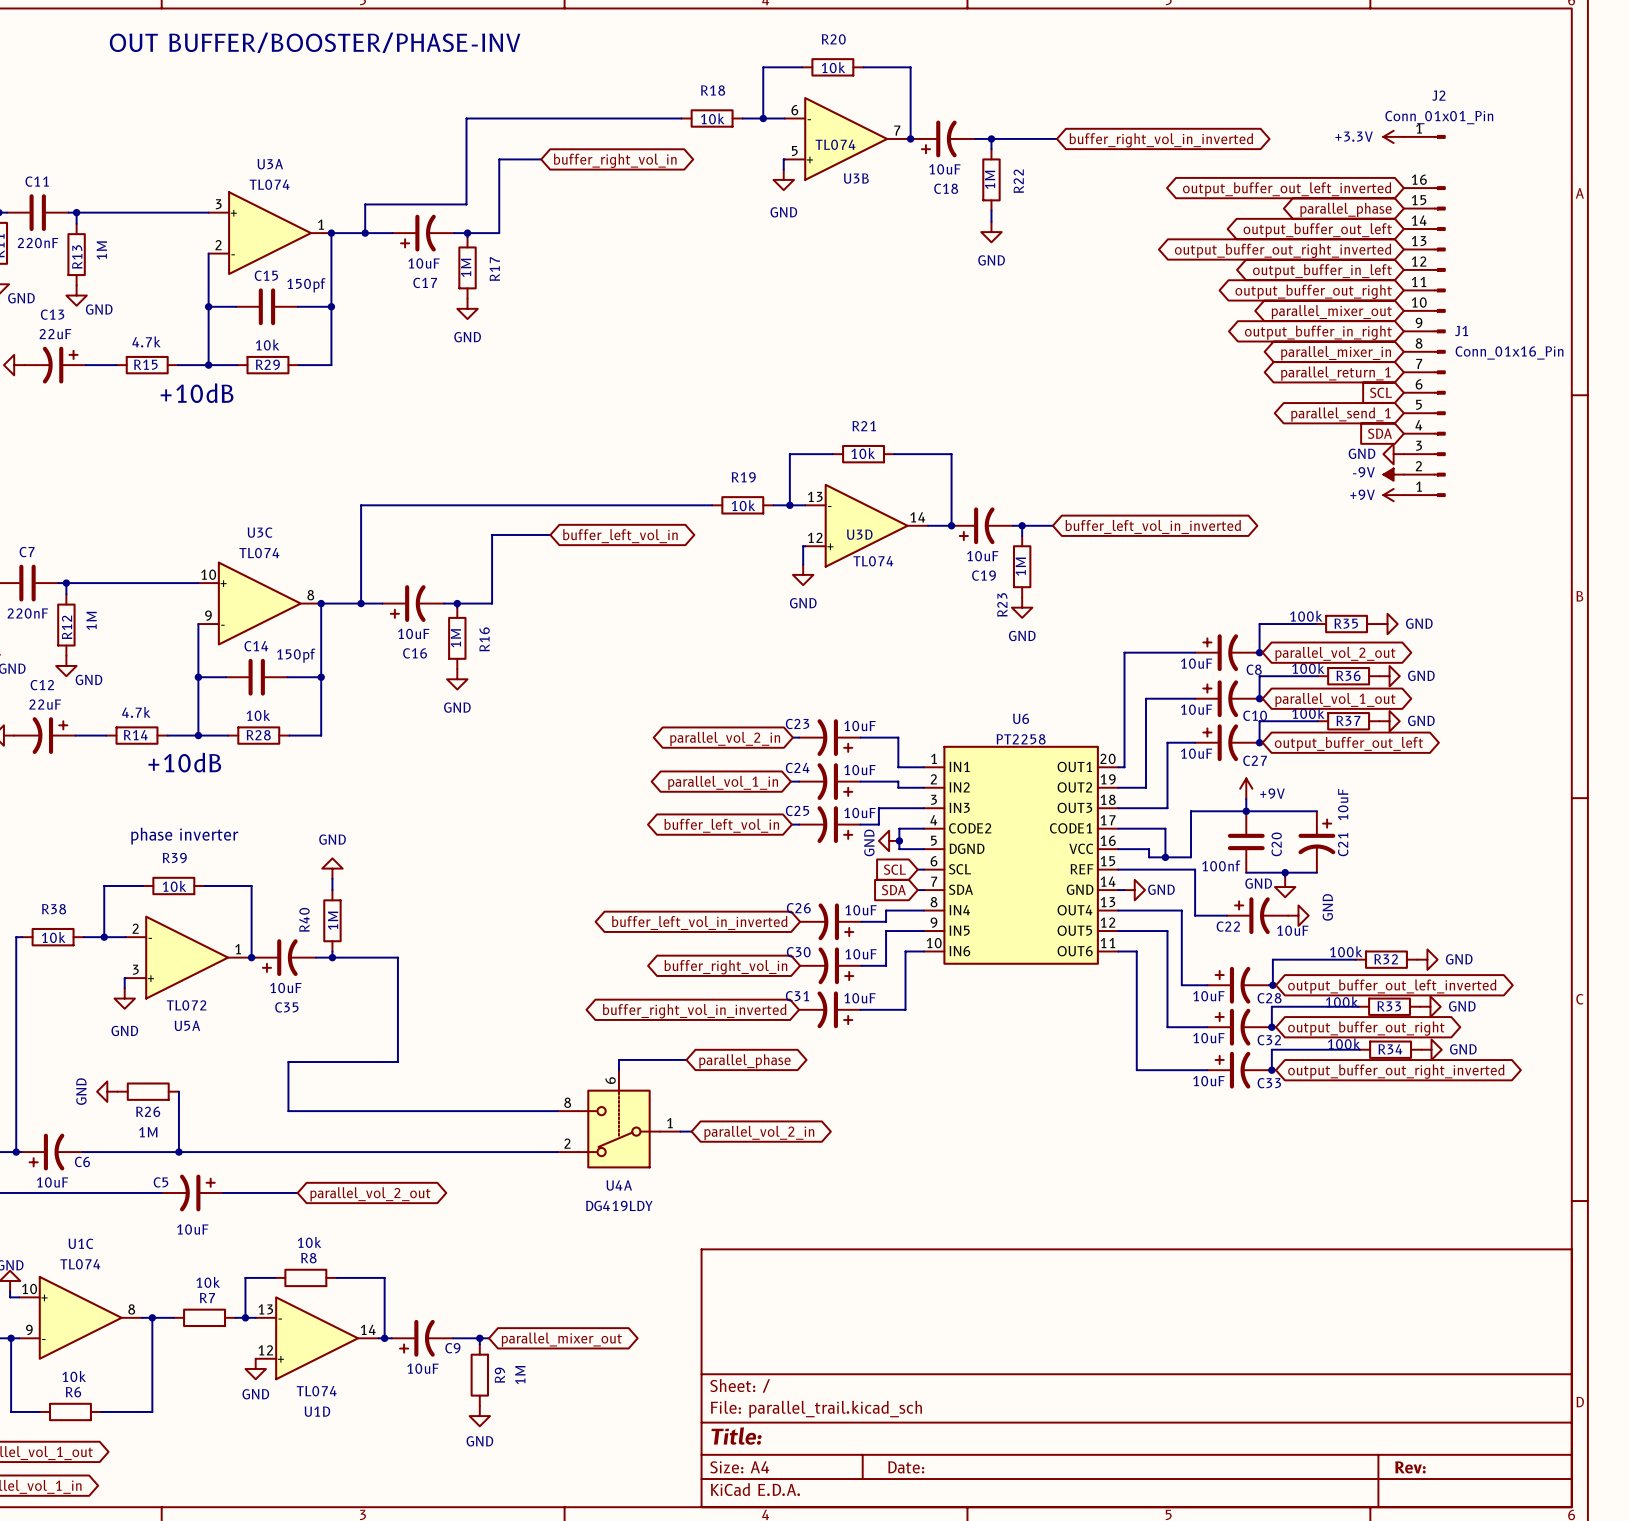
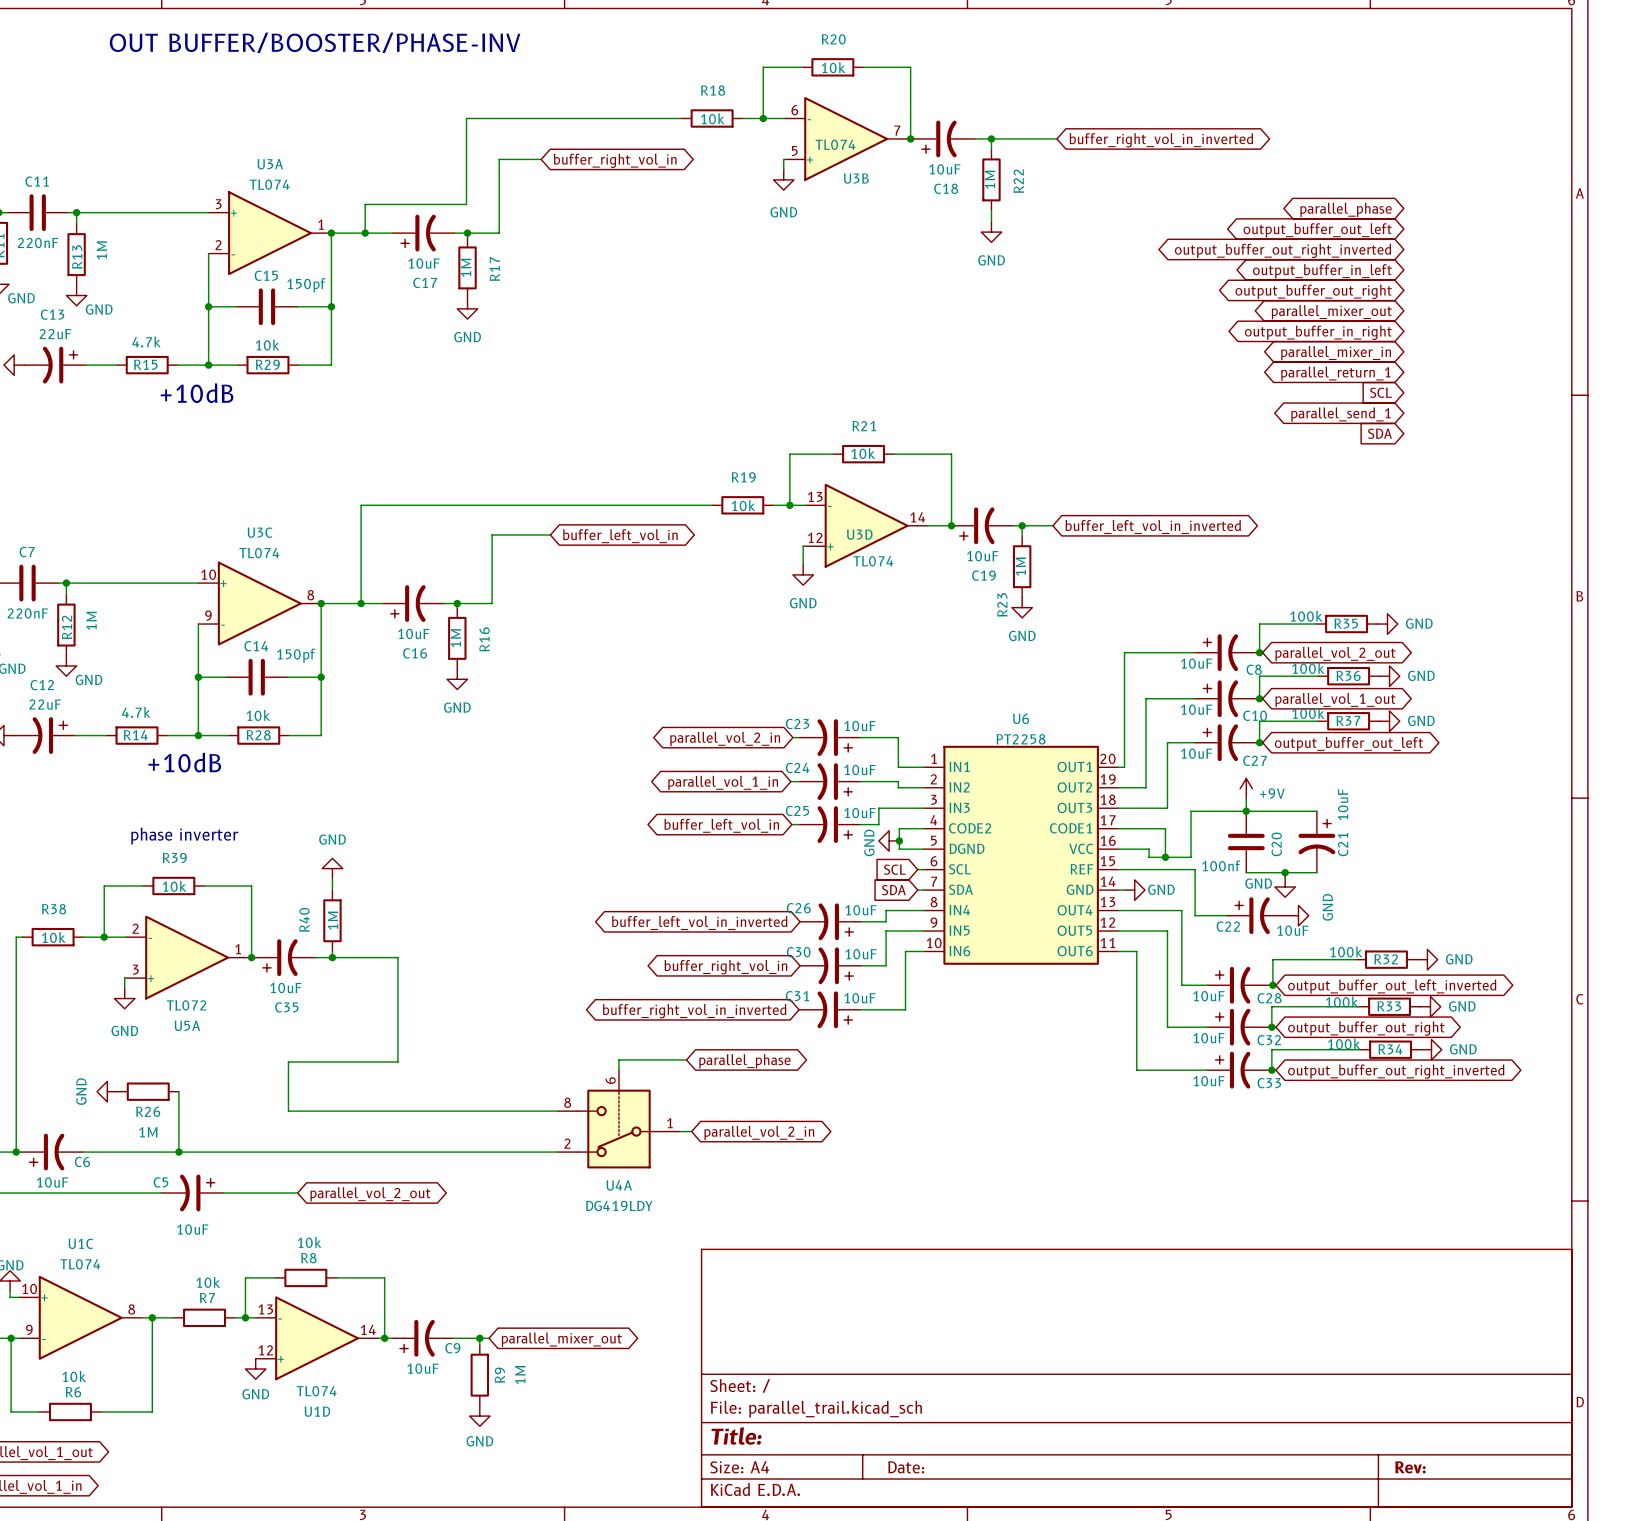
power symbol: +3.3V (1393, 136) -> none
J2: Conn_01x01_Pin (1424, 136) -> none
global label: output_buffer_out_left_inverted (1287, 189) -> none
J1: Conn_01x16_Pin (1424, 341) -> none
power symbol: GND (1393, 454) -> none
power symbol: -9V (1393, 474) -> none
power symbol: +9V (1393, 495) -> none

